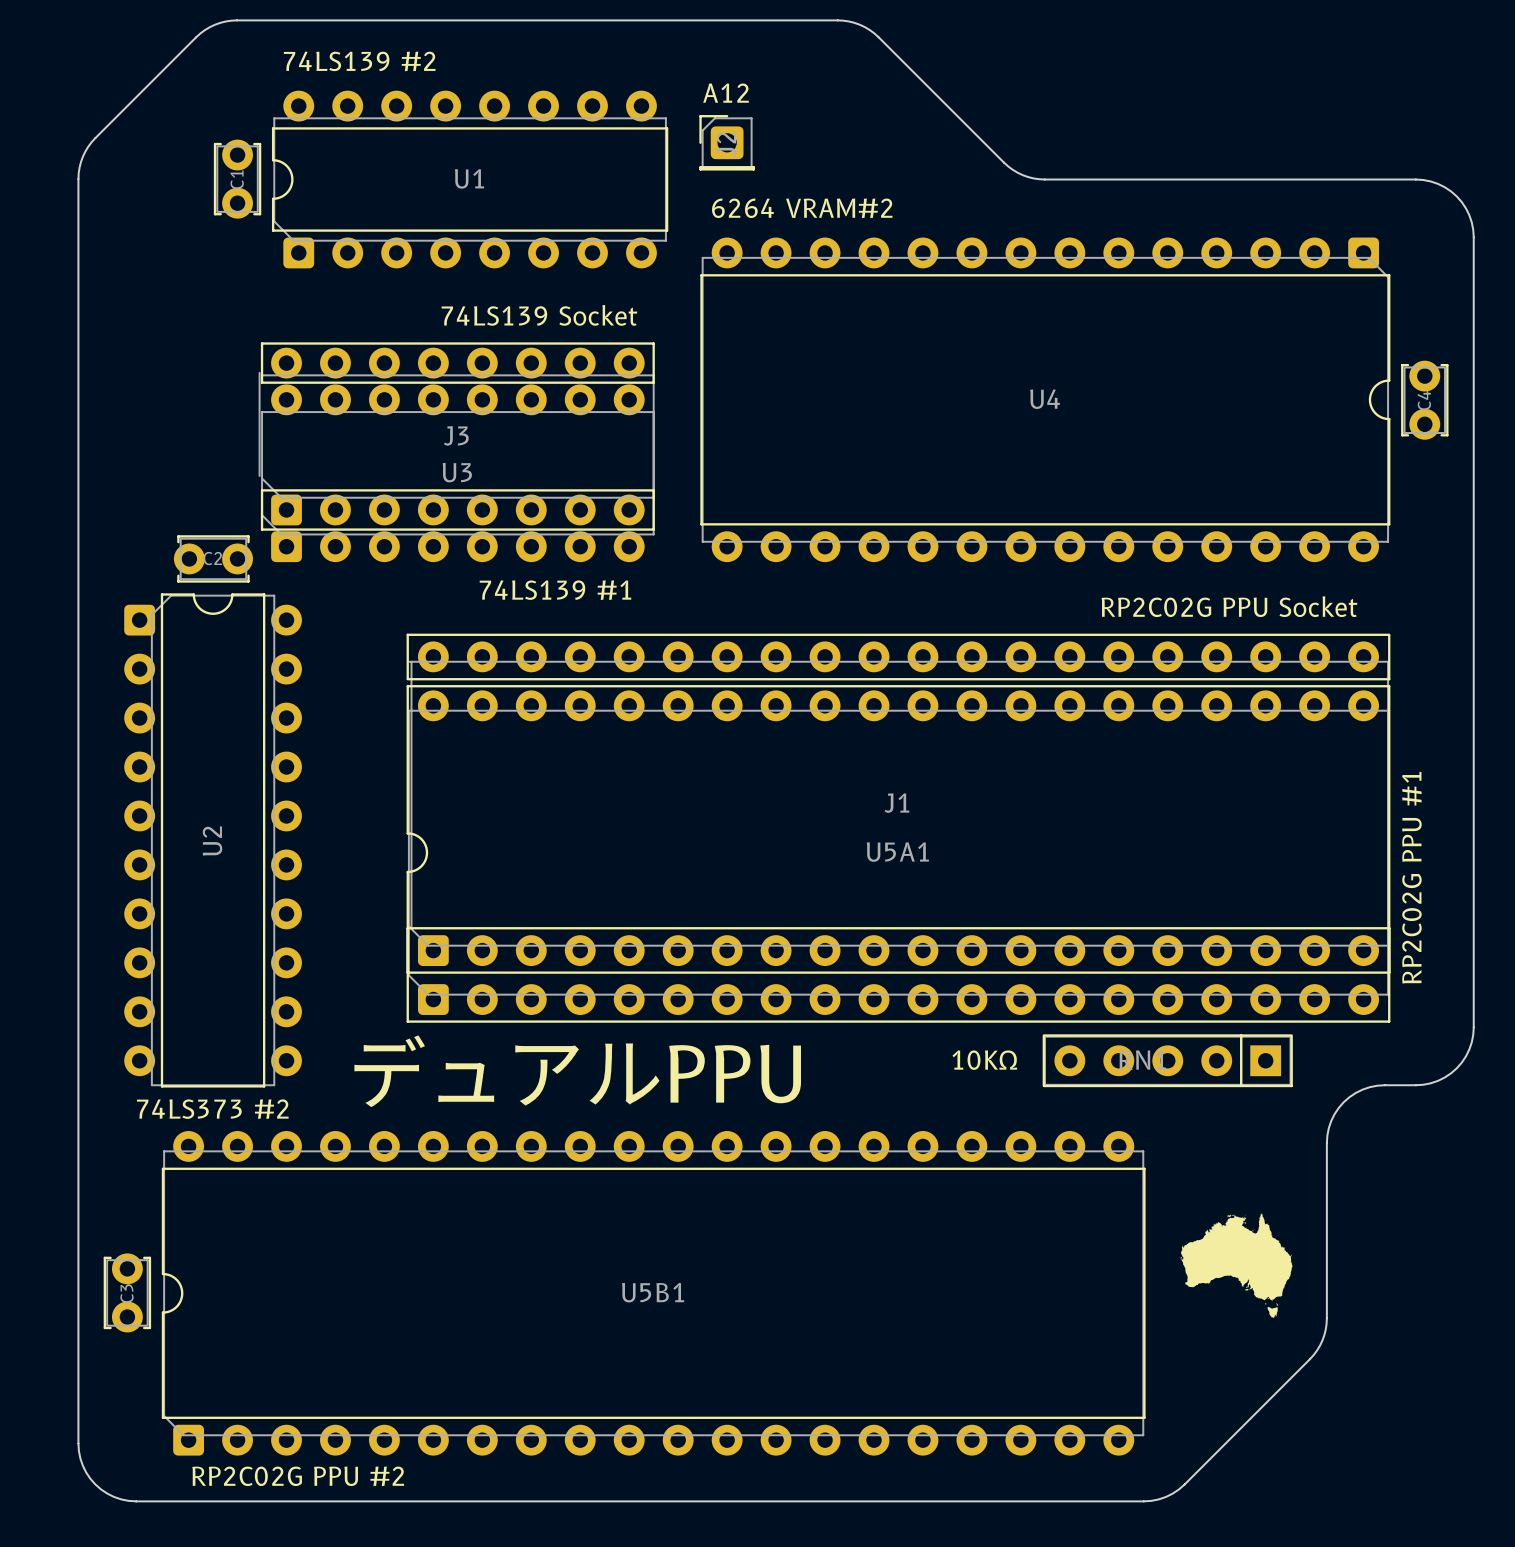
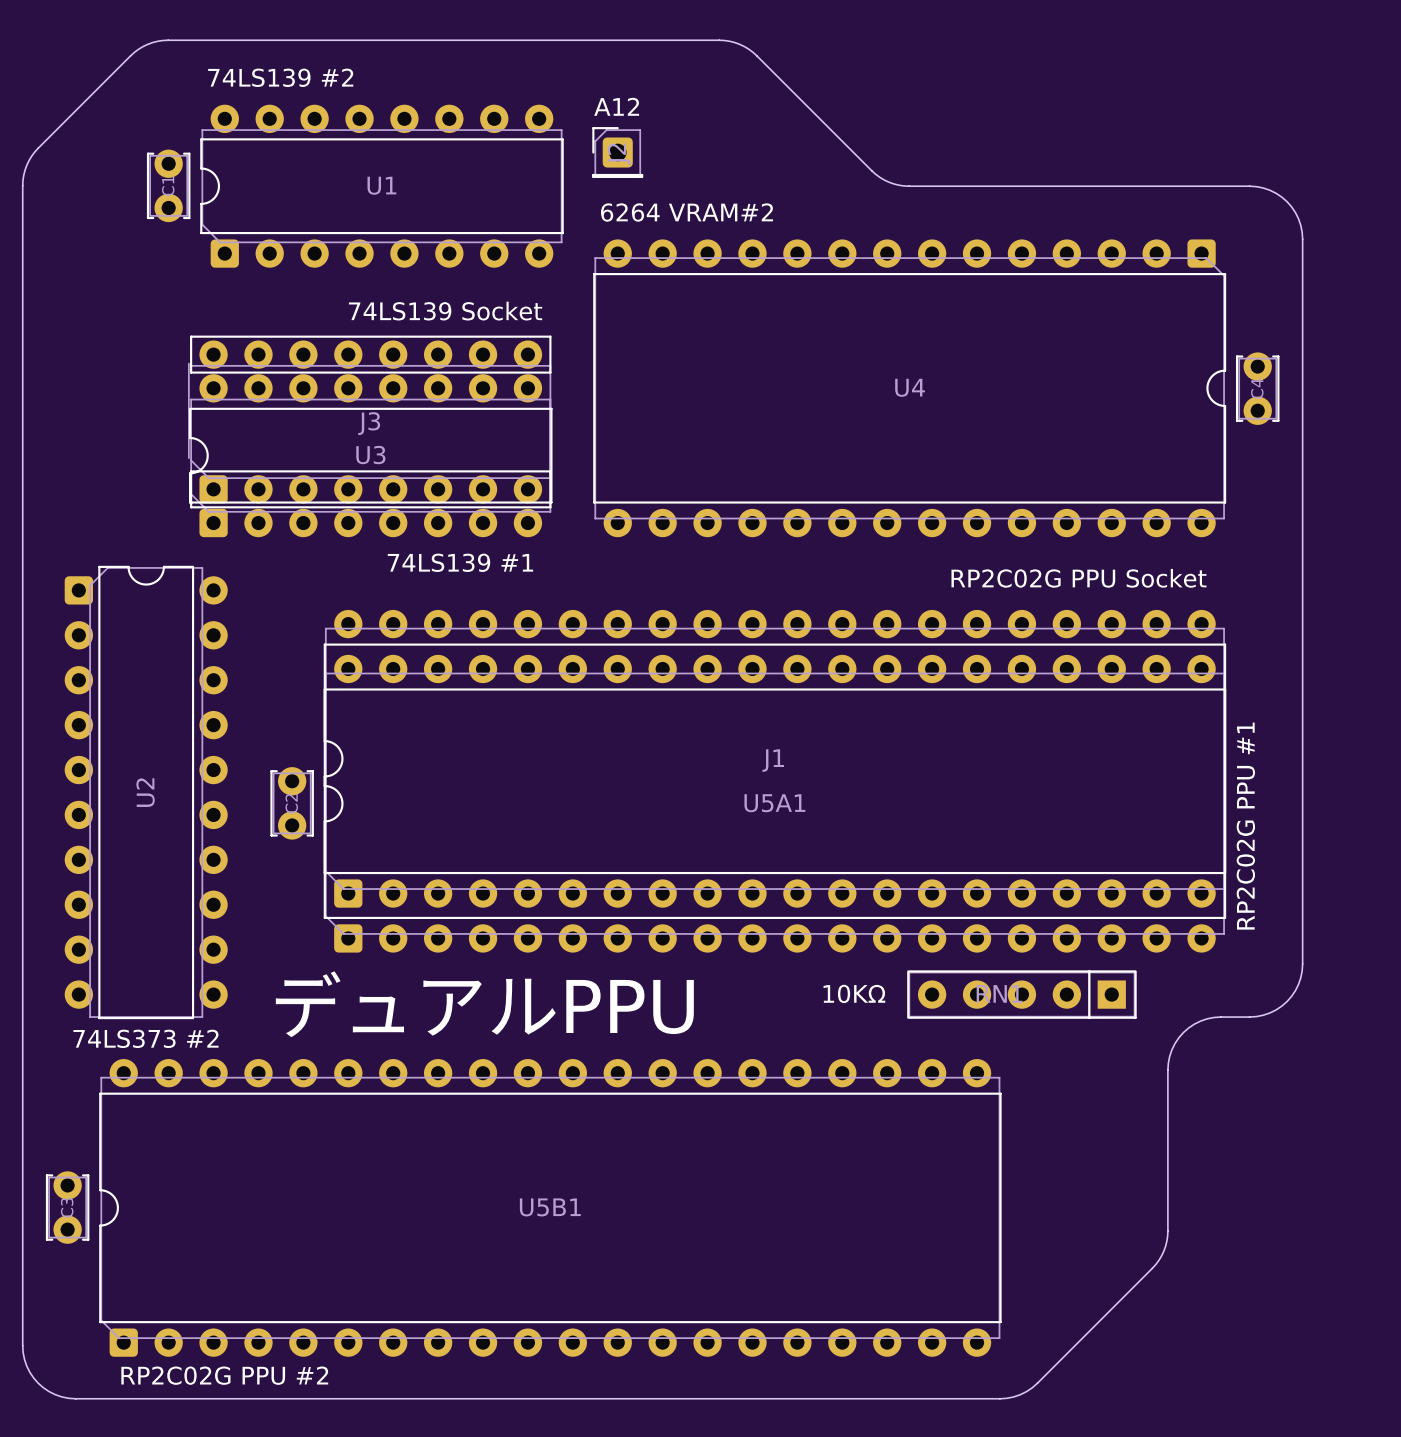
U3 footprint: [261, 384, 655, 563] -> [189, 374, 553, 538]
C2 rotation: 0° (213, 558) -> 90° clockwise (292, 803)
C2 position: (213, 558) -> (292, 803)
J1 footprint: [406, 633, 1391, 974] -> [323, 609, 1227, 908]
U5A1 footprint: [406, 685, 1391, 1023] -> [323, 654, 1227, 953]
drawing: [1179, 1212, 1293, 1318] -> none

